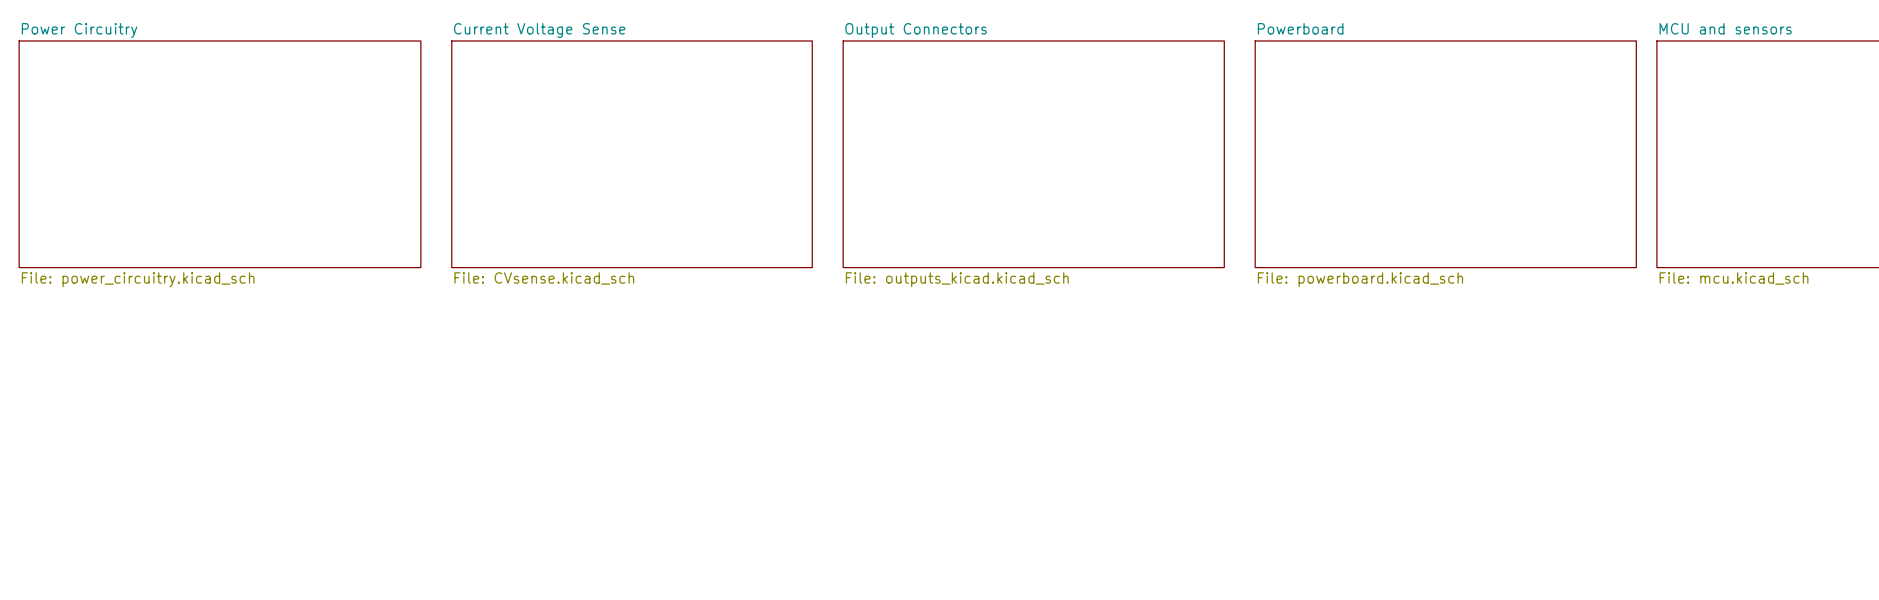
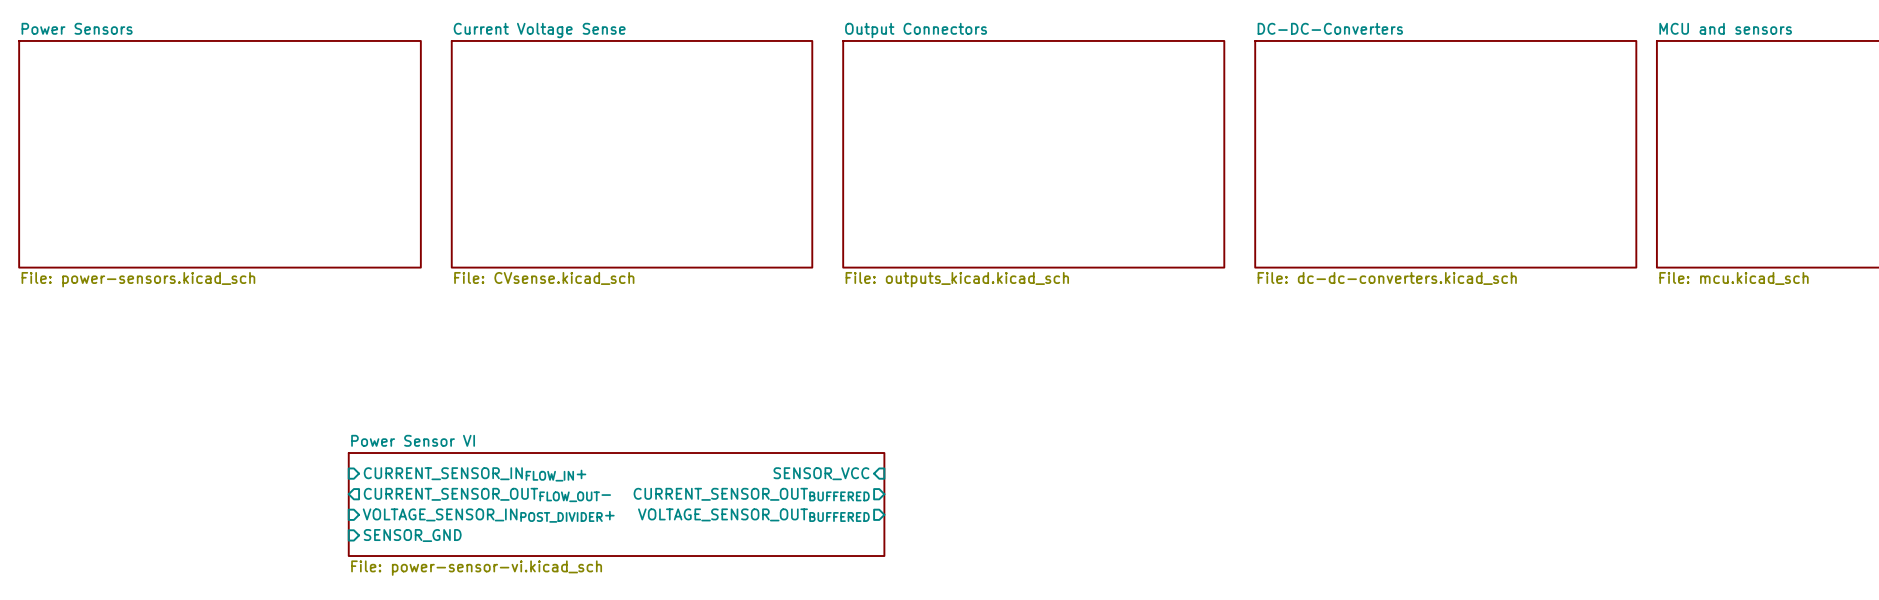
sheet Powerboard name: Powerboard (1300, 28) -> DC-DC-Converters (1330, 28)
sheet Power Circuitry name: Power Circuitry (79, 30) -> Power Sensors (77, 28)
sheet Power Circuitry value: File: power_circuitry.kicad_sch (138, 279) -> File: power-sensors.kicad_sch (138, 279)
sheet Powerboard value: File: powerboard.kicad_sch (1360, 279) -> File: dc-dc-converters.kicad_sch (1387, 278)
sheet pin: none -> SENSOR_VCC (821, 473)
sheet pin: none -> CURRENT_SENSOR_INFLOW_IN+ (475, 474)
sheet pin: none -> CURRENT_SENSOR_OUTFLOW_OUT- (487, 494)
sheet pin: none -> CURRENT_SENSOR_OUTBUFFERED (751, 494)
sheet Power Sensor VI: none -> File: power-sensor-vi.kicad_sch (616, 504)
sheet pin: none -> VOLTAGE_SENSOR_INPOST_DIVIDER+ (488, 515)
sheet pin: none -> VOLTAGE_SENSOR_OUTBUFFERED (753, 515)
sheet pin: none -> SENSOR_GND (412, 535)

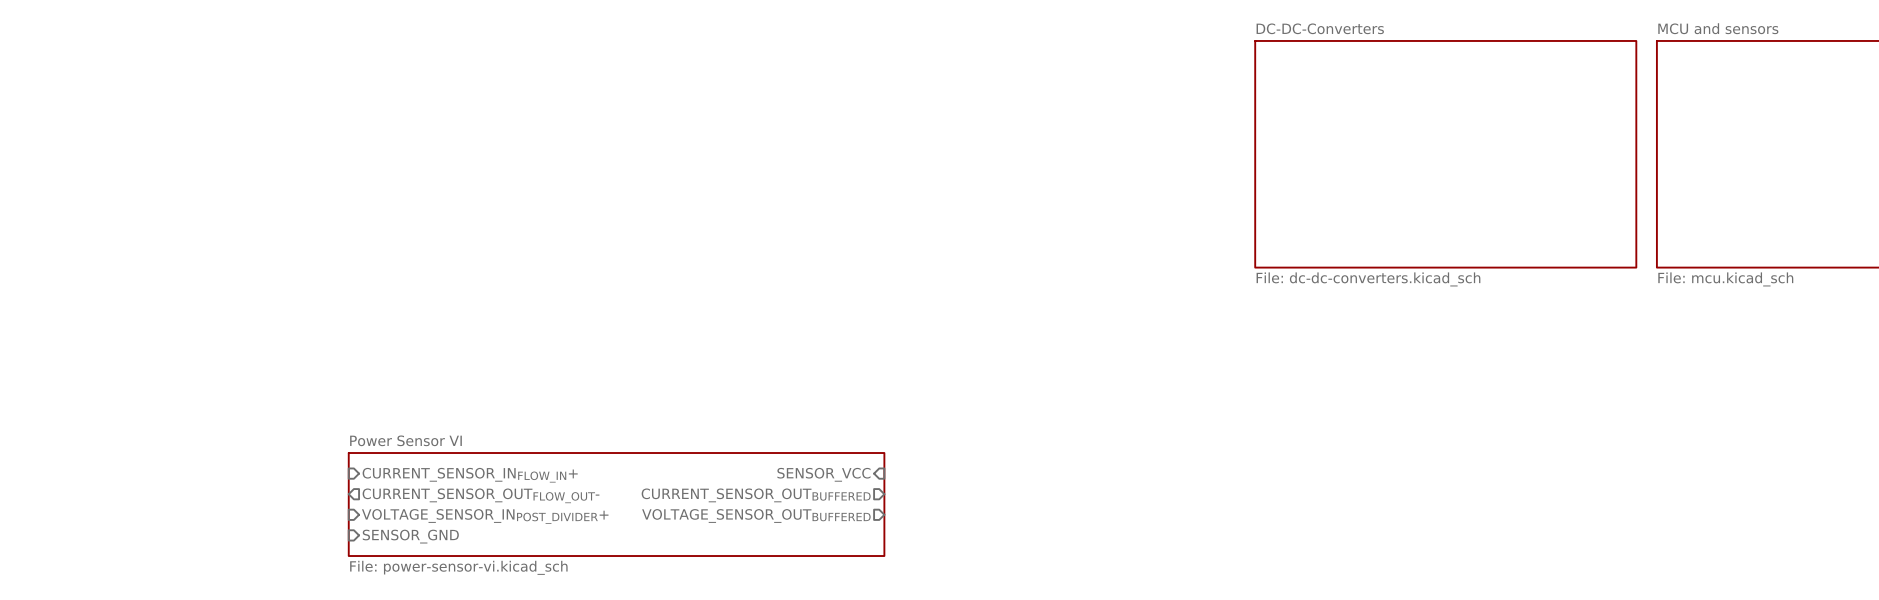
sheet Power Sensors: File: power-sensors.kicad_sch (220, 154) -> none
sheet Current Voltage Sense: File: CVsense.kicad_sch (632, 154) -> none
sheet Output Connectors: File: outputs_kicad.kicad_sch (1033, 154) -> none

